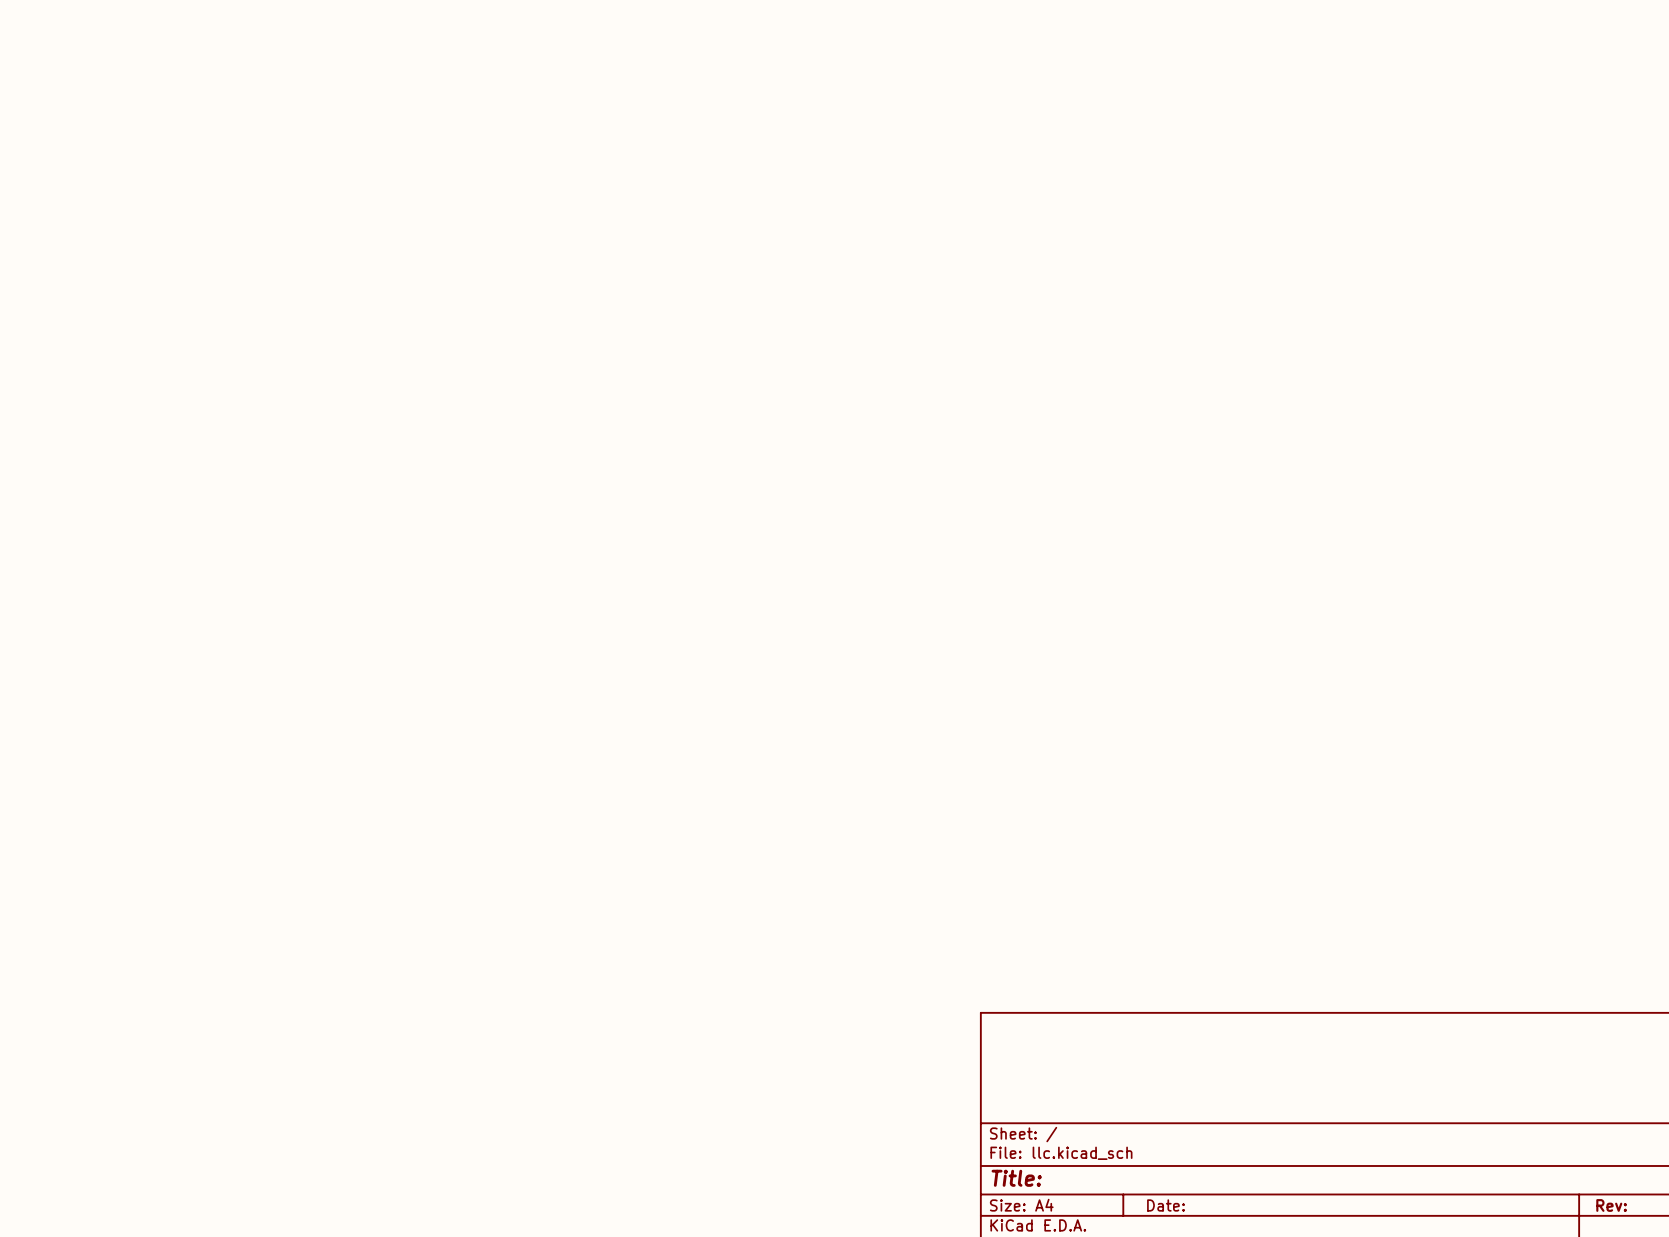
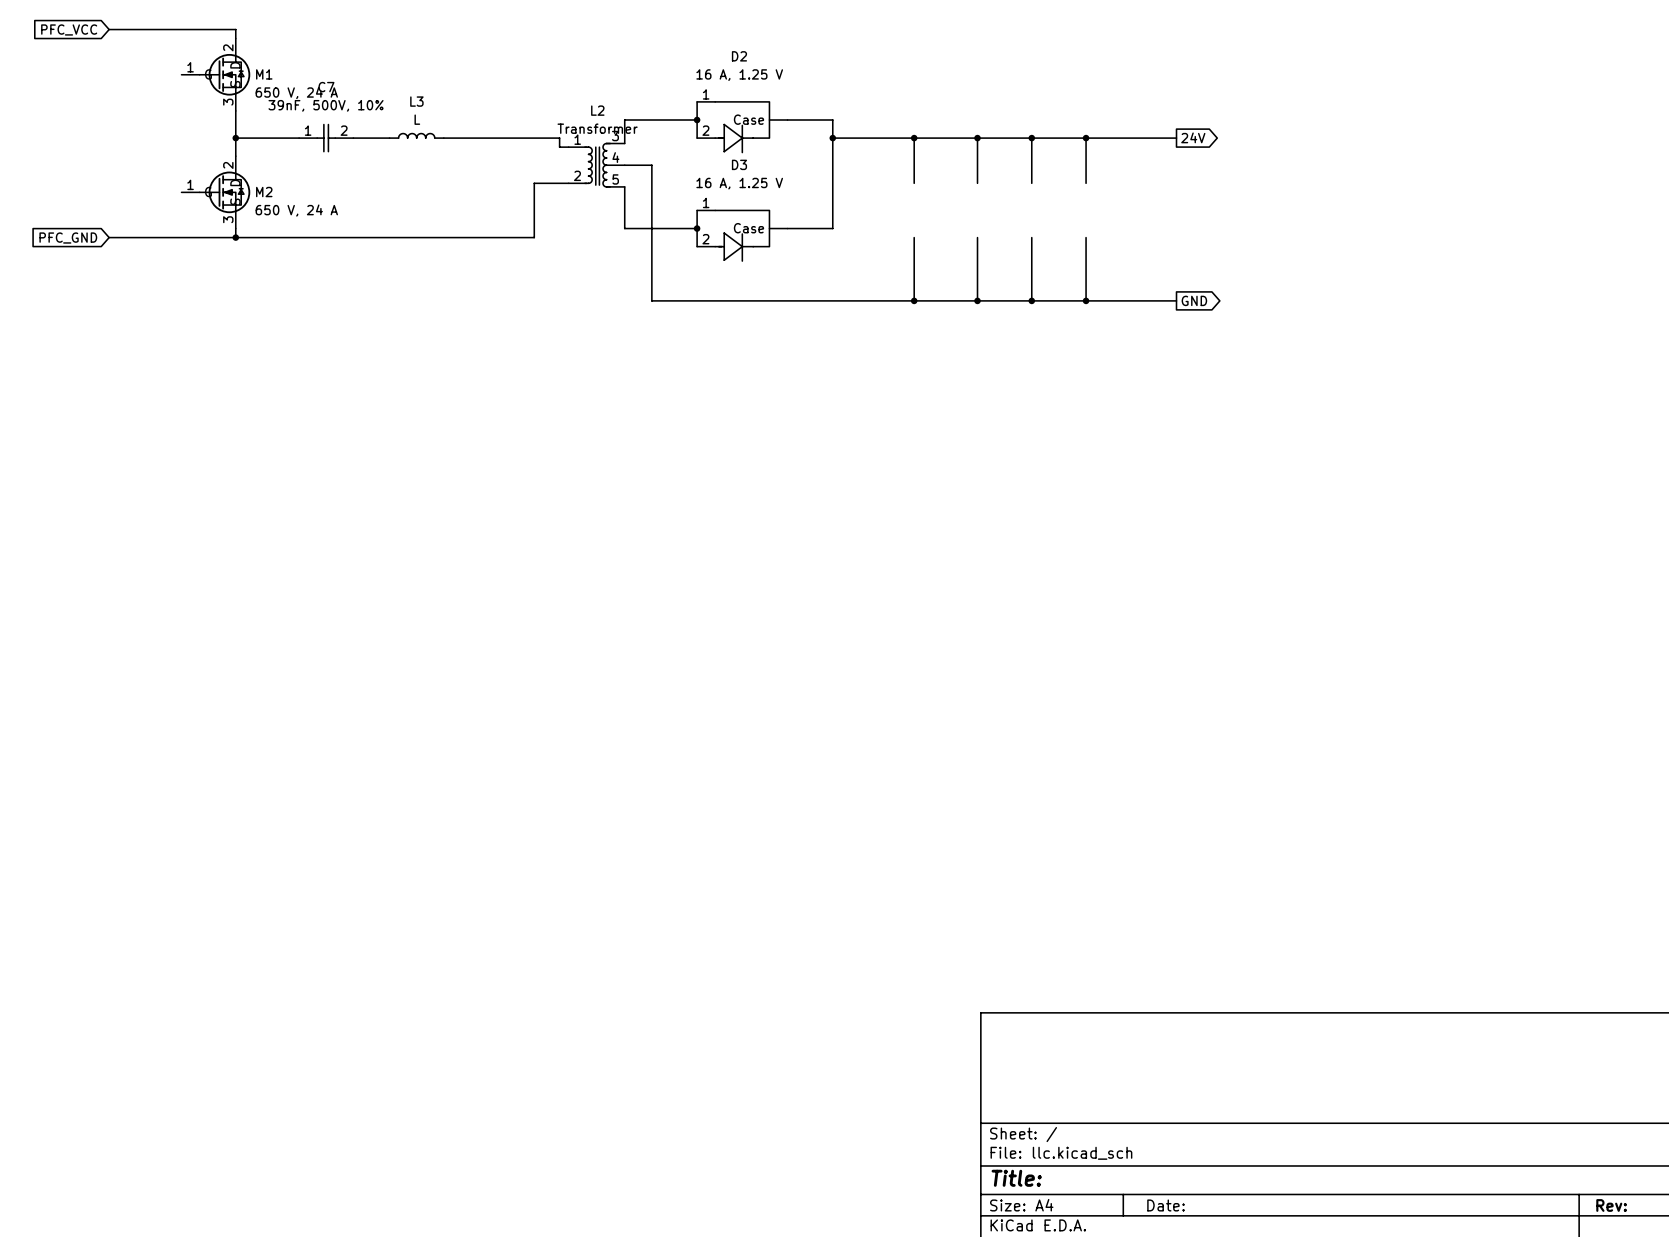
global label: none -> PFC_VCC (69, 29)
wire: none -> (109, 29) (235, 29) (235, 38)
M1: none -> 650 V, 24 A (215, 74)
wire: none -> (697, 101) (697, 138)
wire: none -> (235, 110) (235, 156)
wire: none -> (697, 120) (624, 120) (624, 143)
junction: none -> (697, 120)
wire: none -> (787, 120) (832, 120) (832, 228) (787, 228)
D2: none -> 16 A, 1.25 V (742, 127)
L3: none -> L (416, 135)
global label: none -> 24V (1193, 137)
wire: none -> (235, 138) (299, 138)
junction: none -> (235, 138)
C7: none -> 39nF, 500V, 10% (326, 138)
wire: none -> (353, 138) (389, 138)
wire: none -> (443, 138) (559, 138) (559, 147) (568, 147)
wire: none -> (832, 138) (1176, 138)
junction: none -> (832, 138)
wire: none -> (914, 138) (914, 183)
junction: none -> (914, 138)
wire: none -> (977, 138) (977, 183)
junction: none -> (977, 138)
wire: none -> (1031, 138) (1031, 183)
junction: none -> (1031, 138)
wire: none -> (1086, 138) (1086, 183)
junction: none -> (1086, 138)
L2: none -> Transformer (596, 165)
wire: none -> (624, 165) (651, 165) (651, 300) (1176, 300)
wire: none -> (568, 183) (534, 183) (534, 237) (109, 237)
wire: none -> (624, 186) (624, 228) (697, 228)
M2: none -> 650 V, 24 A (215, 192)
wire: none -> (697, 210) (697, 246)
wire: none -> (235, 228) (235, 237)
junction: none -> (697, 228)
D3: none -> 16 A, 1.25 V (742, 236)
junction: none -> (235, 237)
wire: none -> (914, 237) (914, 300)
wire: none -> (977, 237) (977, 300)
wire: none -> (1031, 237) (1031, 300)
wire: none -> (1086, 237) (1086, 300)
global label: none -> PFC_GND (68, 238)
junction: none -> (914, 300)
junction: none -> (977, 300)
junction: none -> (1031, 300)
junction: none -> (1086, 300)
global label: none -> GND (1194, 300)

